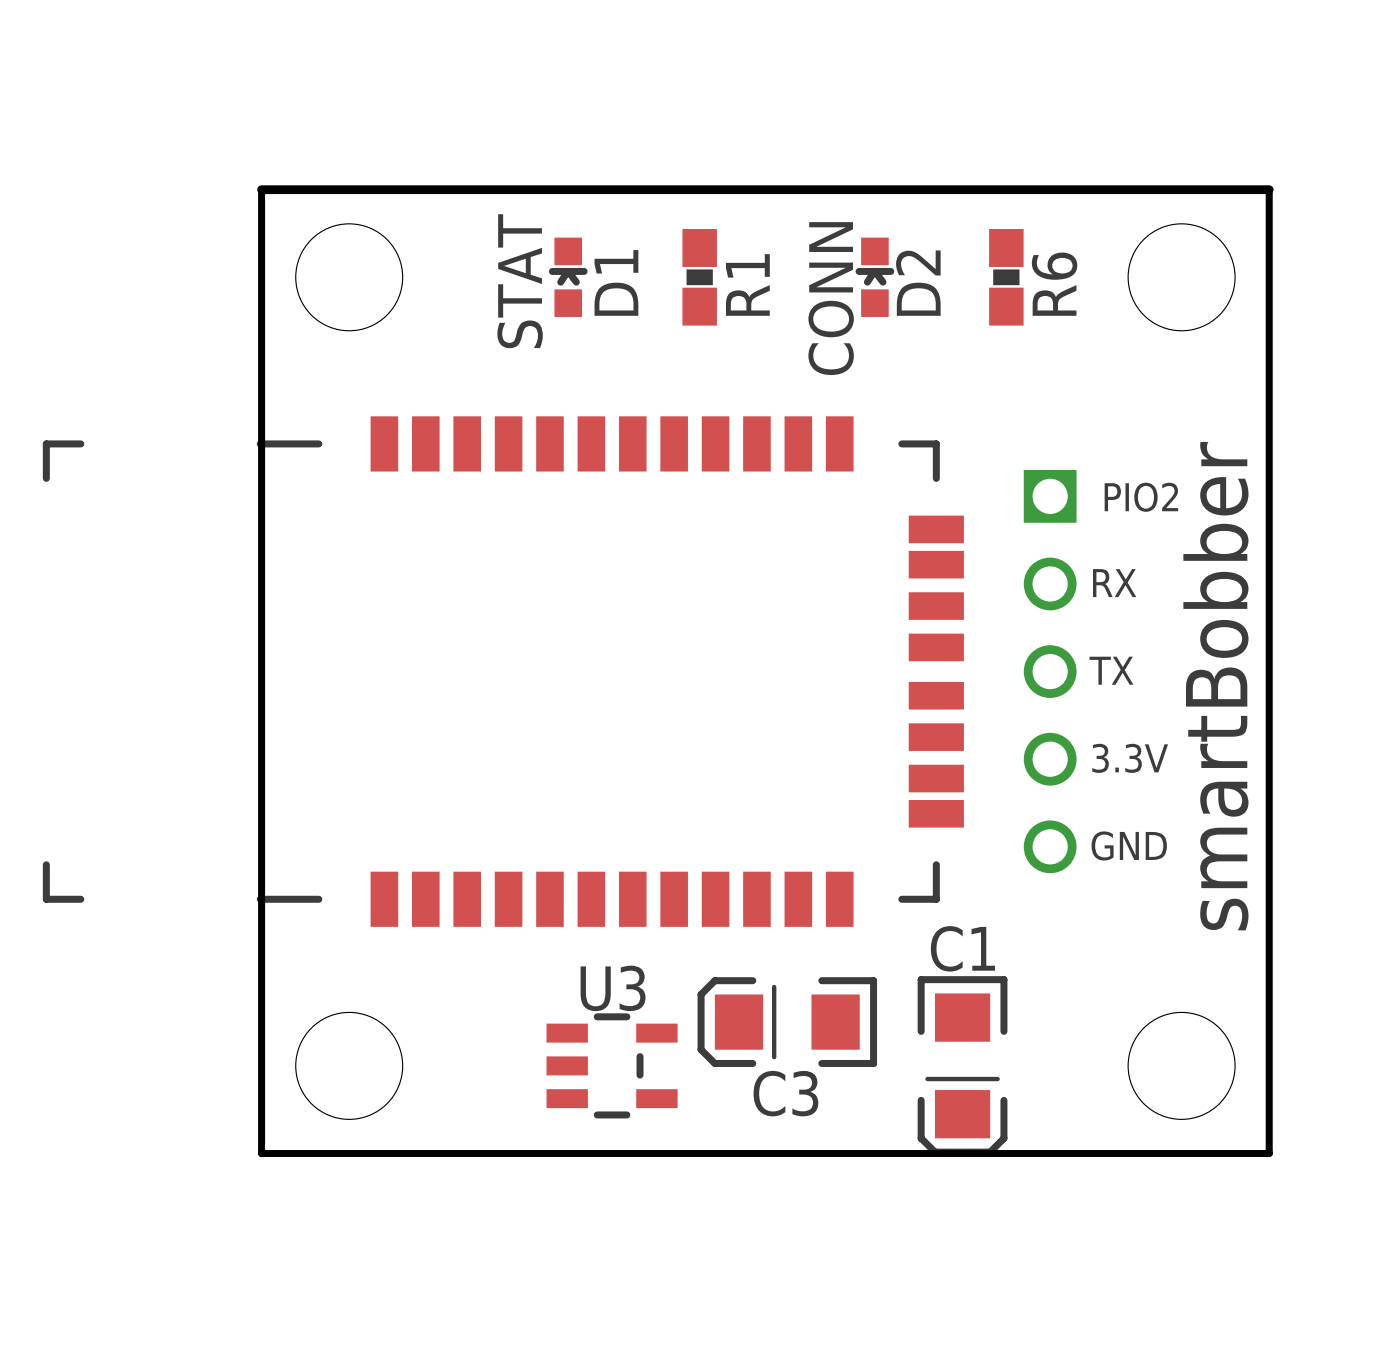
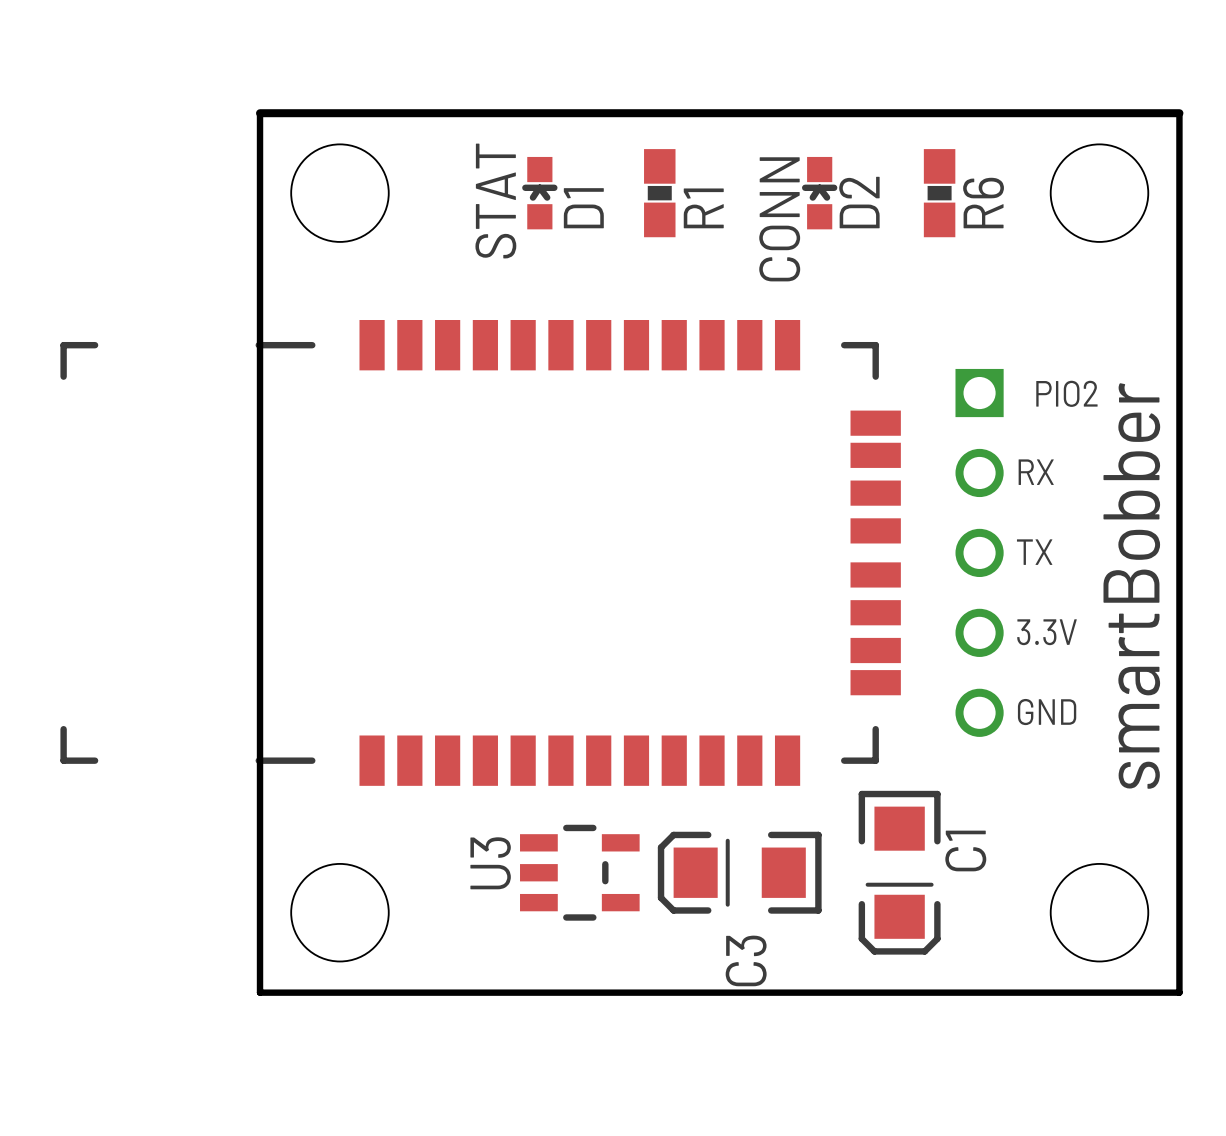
C1 name rotation: 0° (962, 948) -> 90° counterclockwise (965, 850)
C1 name position: C1 (962, 948) -> C1 (965, 850)
U3 name rotation: 0° (613, 988) -> 90° counterclockwise (490, 863)
U3 position: (612, 1065) -> (579, 872)
C1 position: (962, 1065) -> (899, 872)
C3 name rotation: 0° (785, 1093) -> 90° counterclockwise (746, 960)

